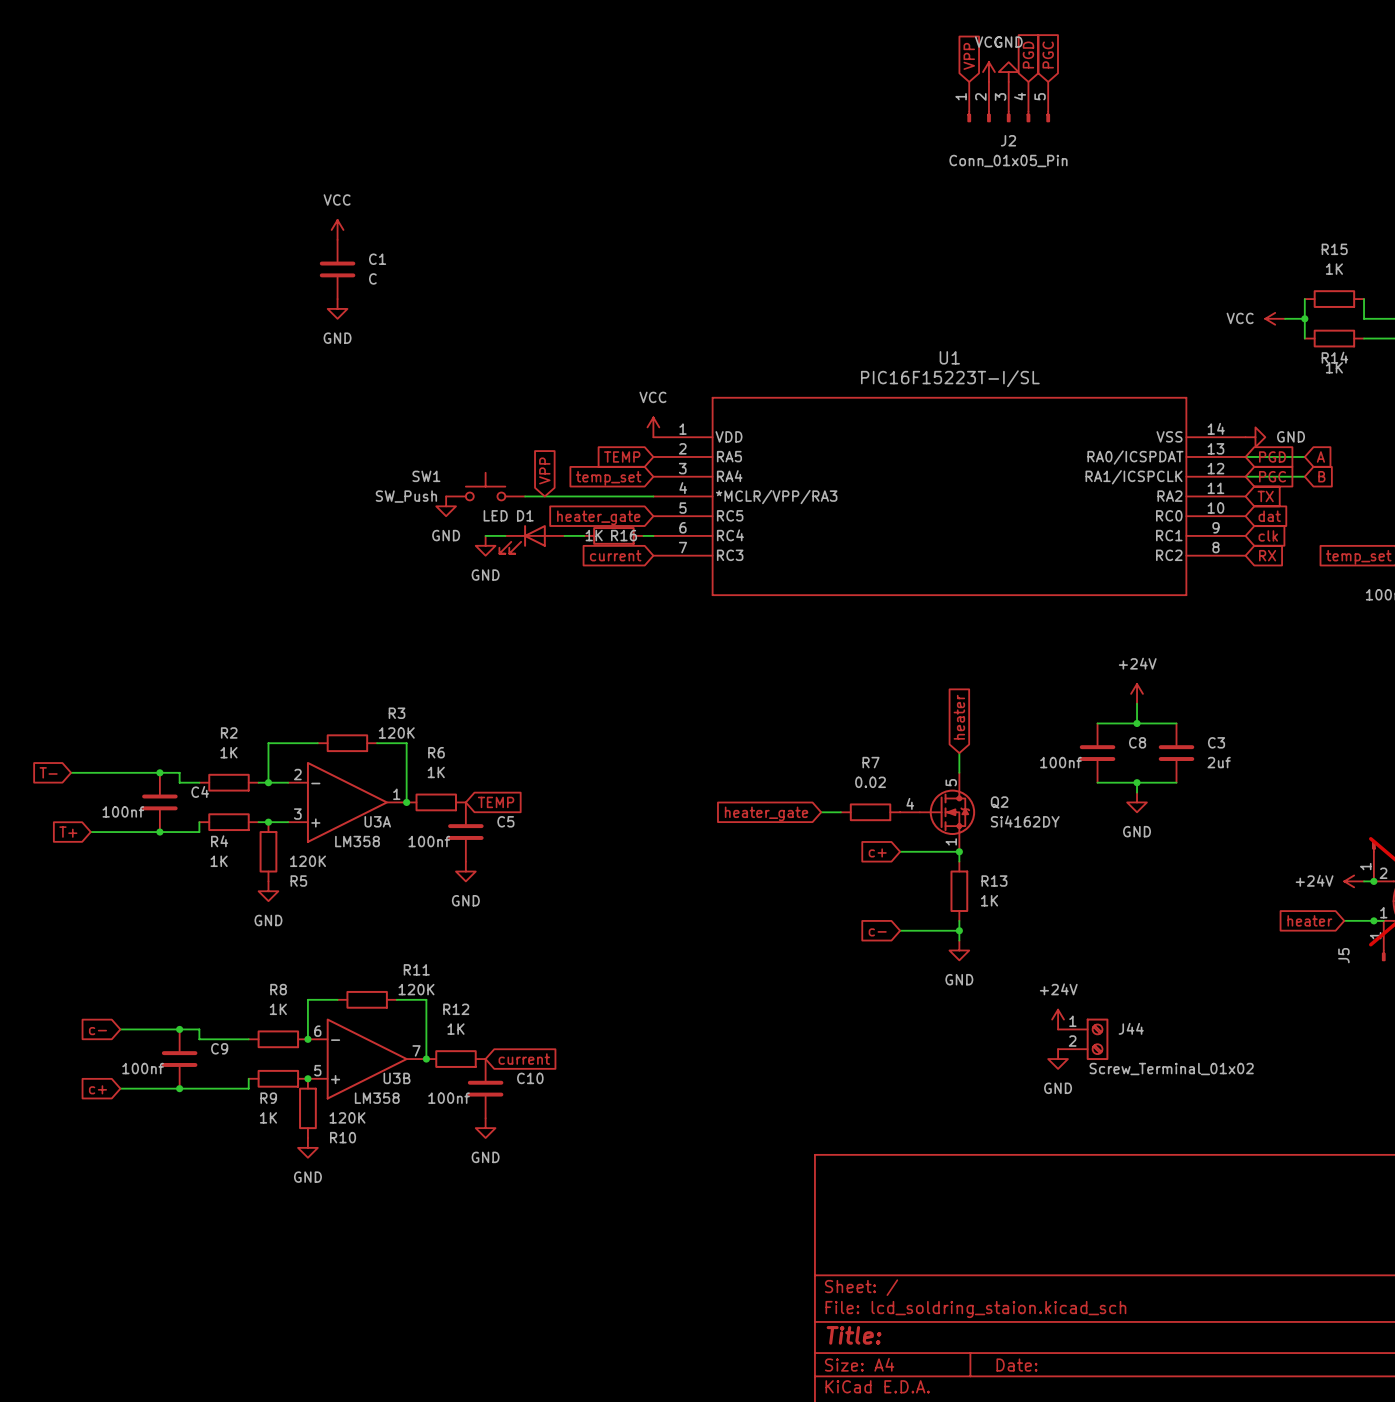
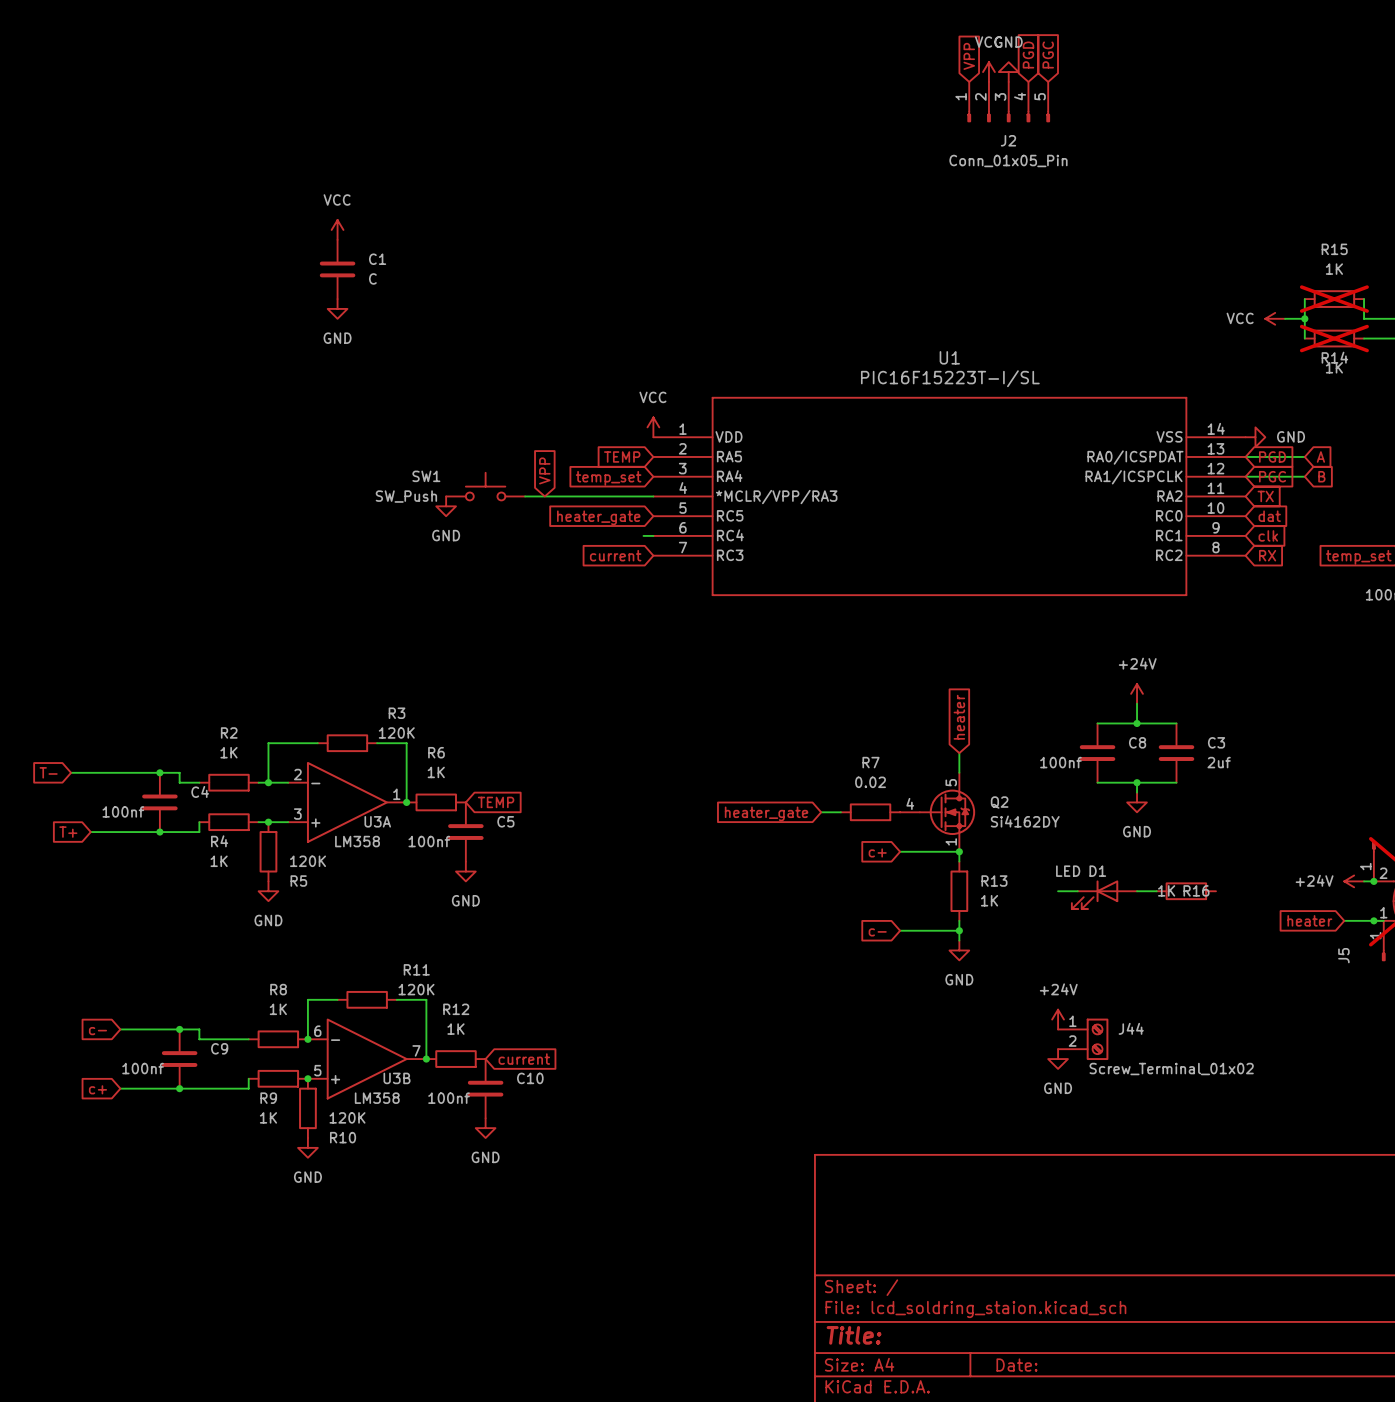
R15 do-not-place cross: none -> (1334, 299)
R14 do-not-place cross: none -> (1334, 338)
wire: (485, 535) (505, 535) -> none
wire: (564, 535) (584, 535) -> none
R16 position: (613, 535) -> (1186, 891)
D1 position: (531, 539) -> (1104, 894)
power symbol: GND (485, 545) -> none
wire: none -> (1058, 891) (1077, 891)
wire: none -> (1137, 891) (1156, 891)

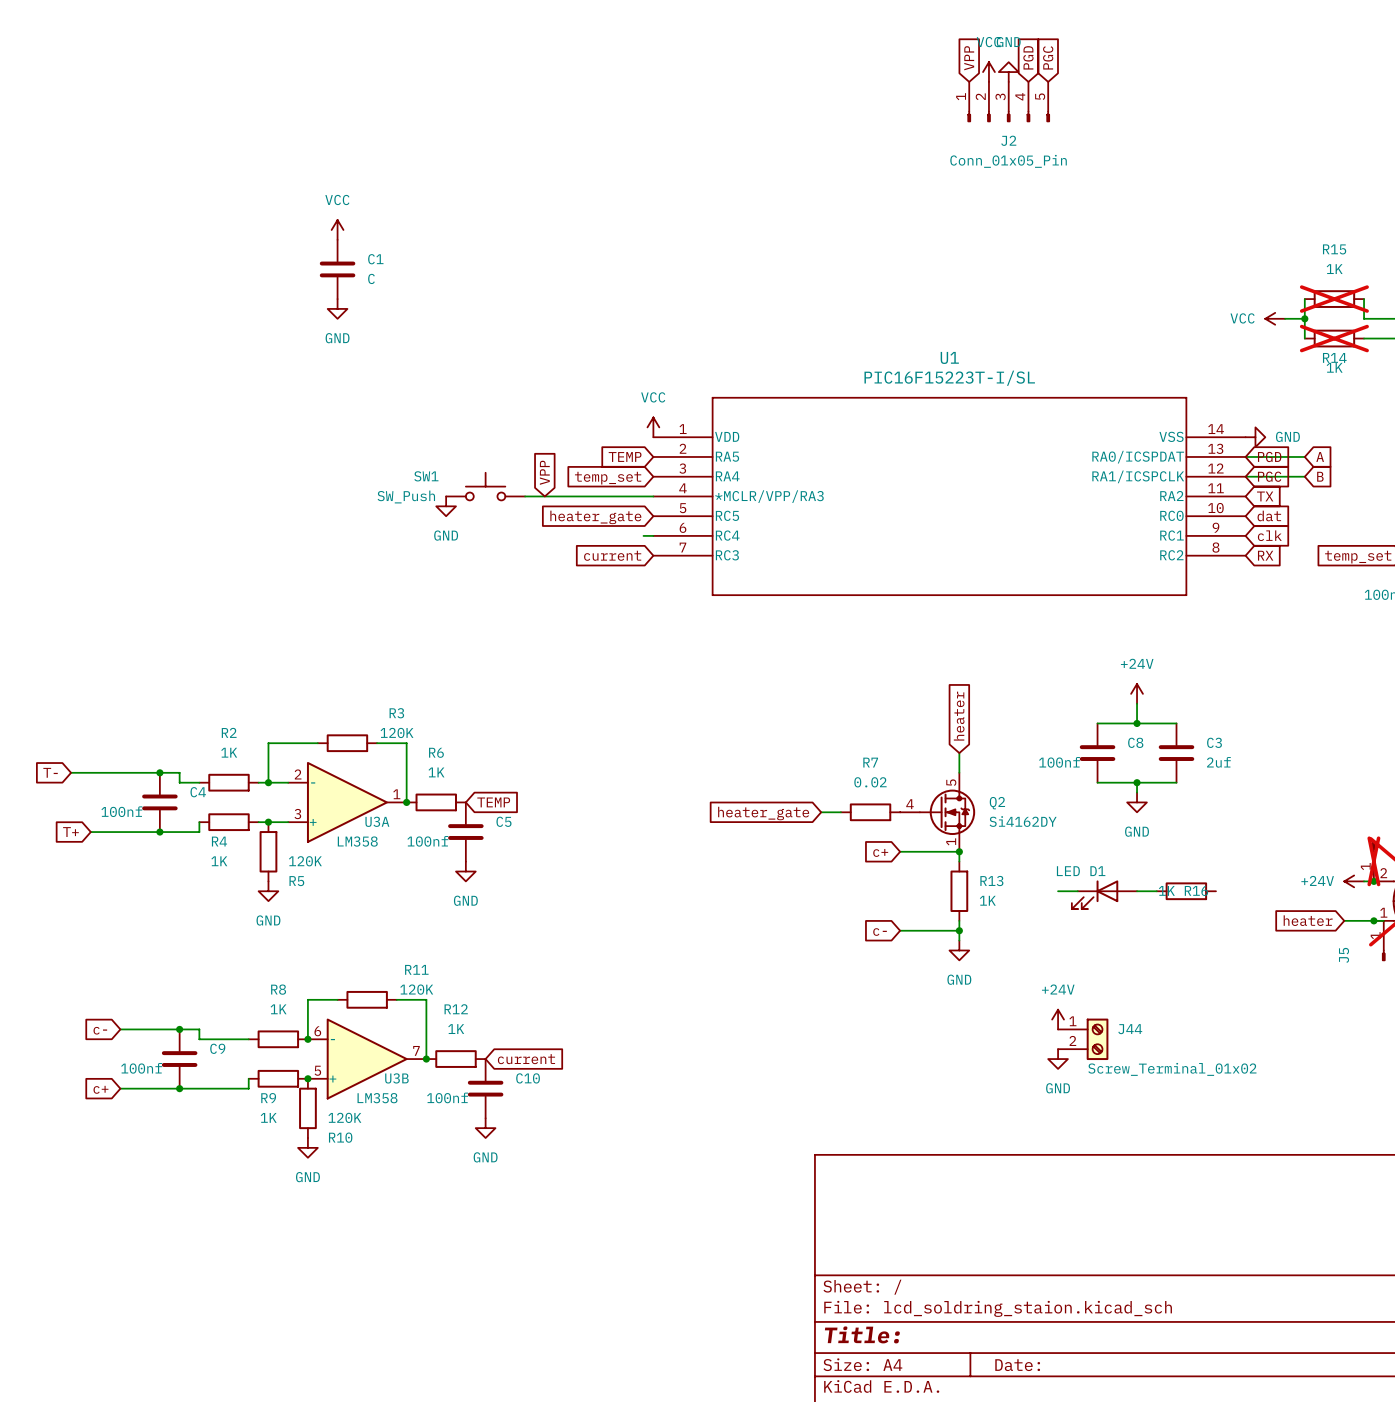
part do-not-place cross: none -> (1373, 861)

